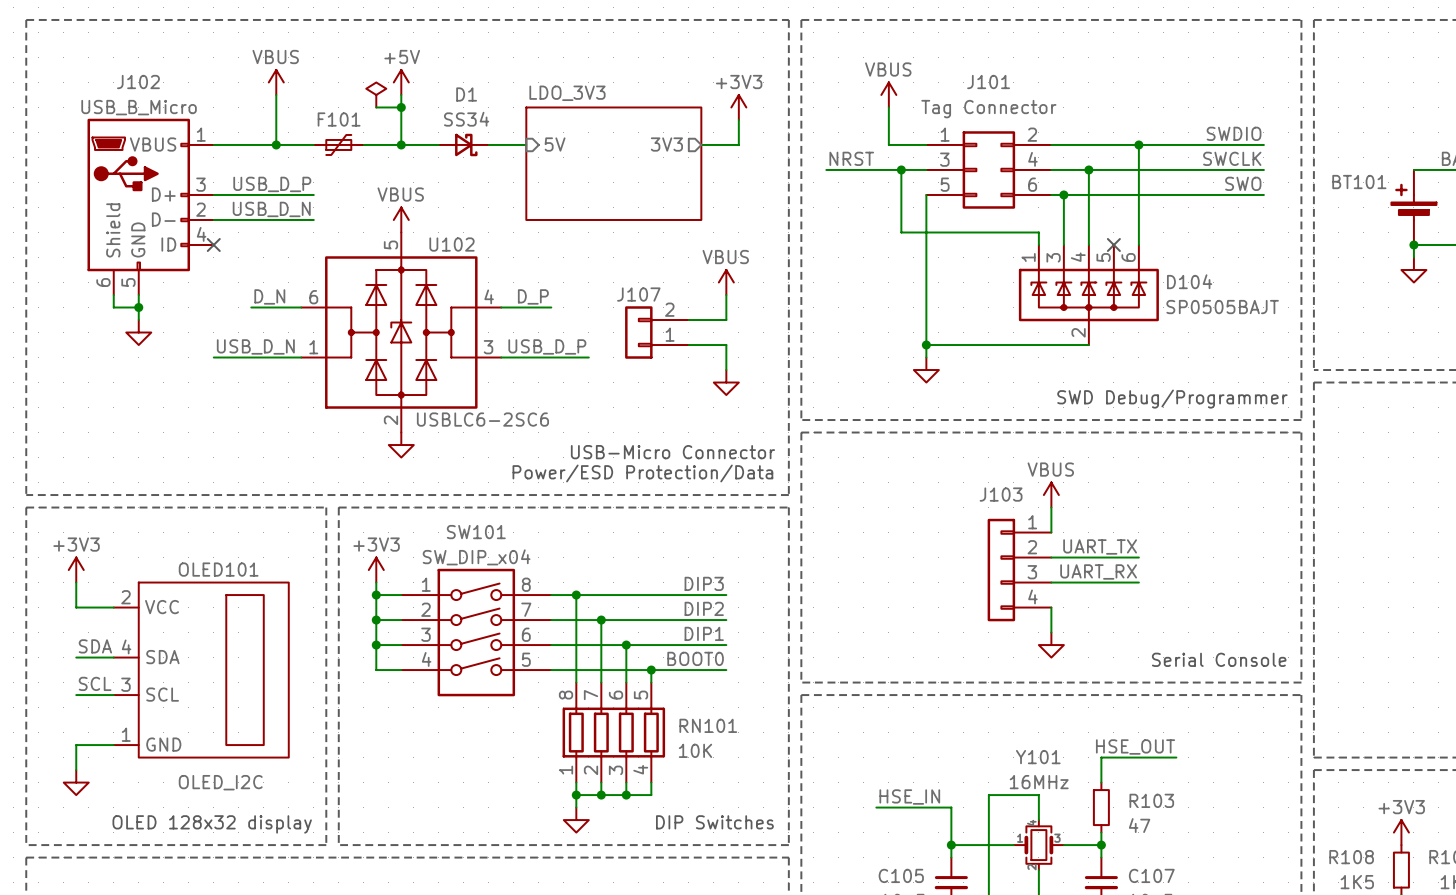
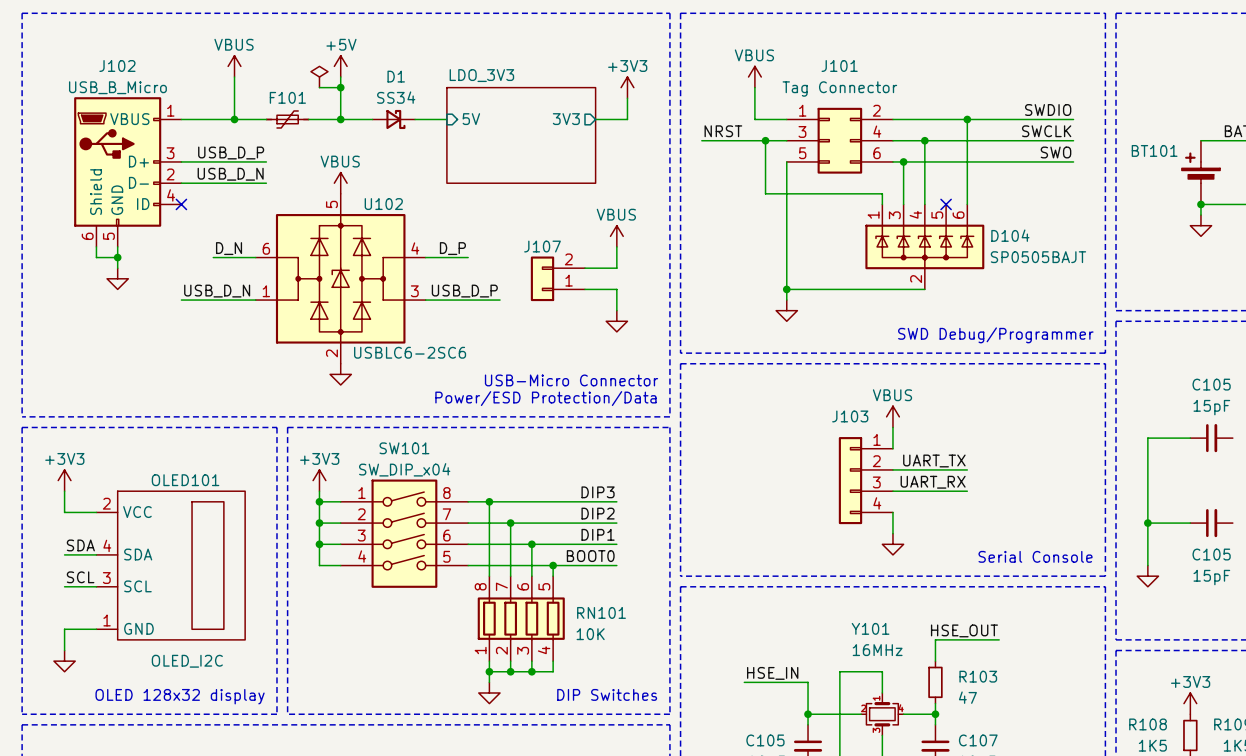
wire: none -> (1190, 438) (1147, 438) (1147, 565)
C105: none -> 15pF (1211, 438)
wire: none -> (1147, 523) (1190, 523)
junction: none -> (1147, 523)
C105: none -> 15pF (1211, 523)
power symbol: none -> (1147, 576)
Y101 rotation: 0° (1038, 845) -> 90° clockwise (882, 714)

